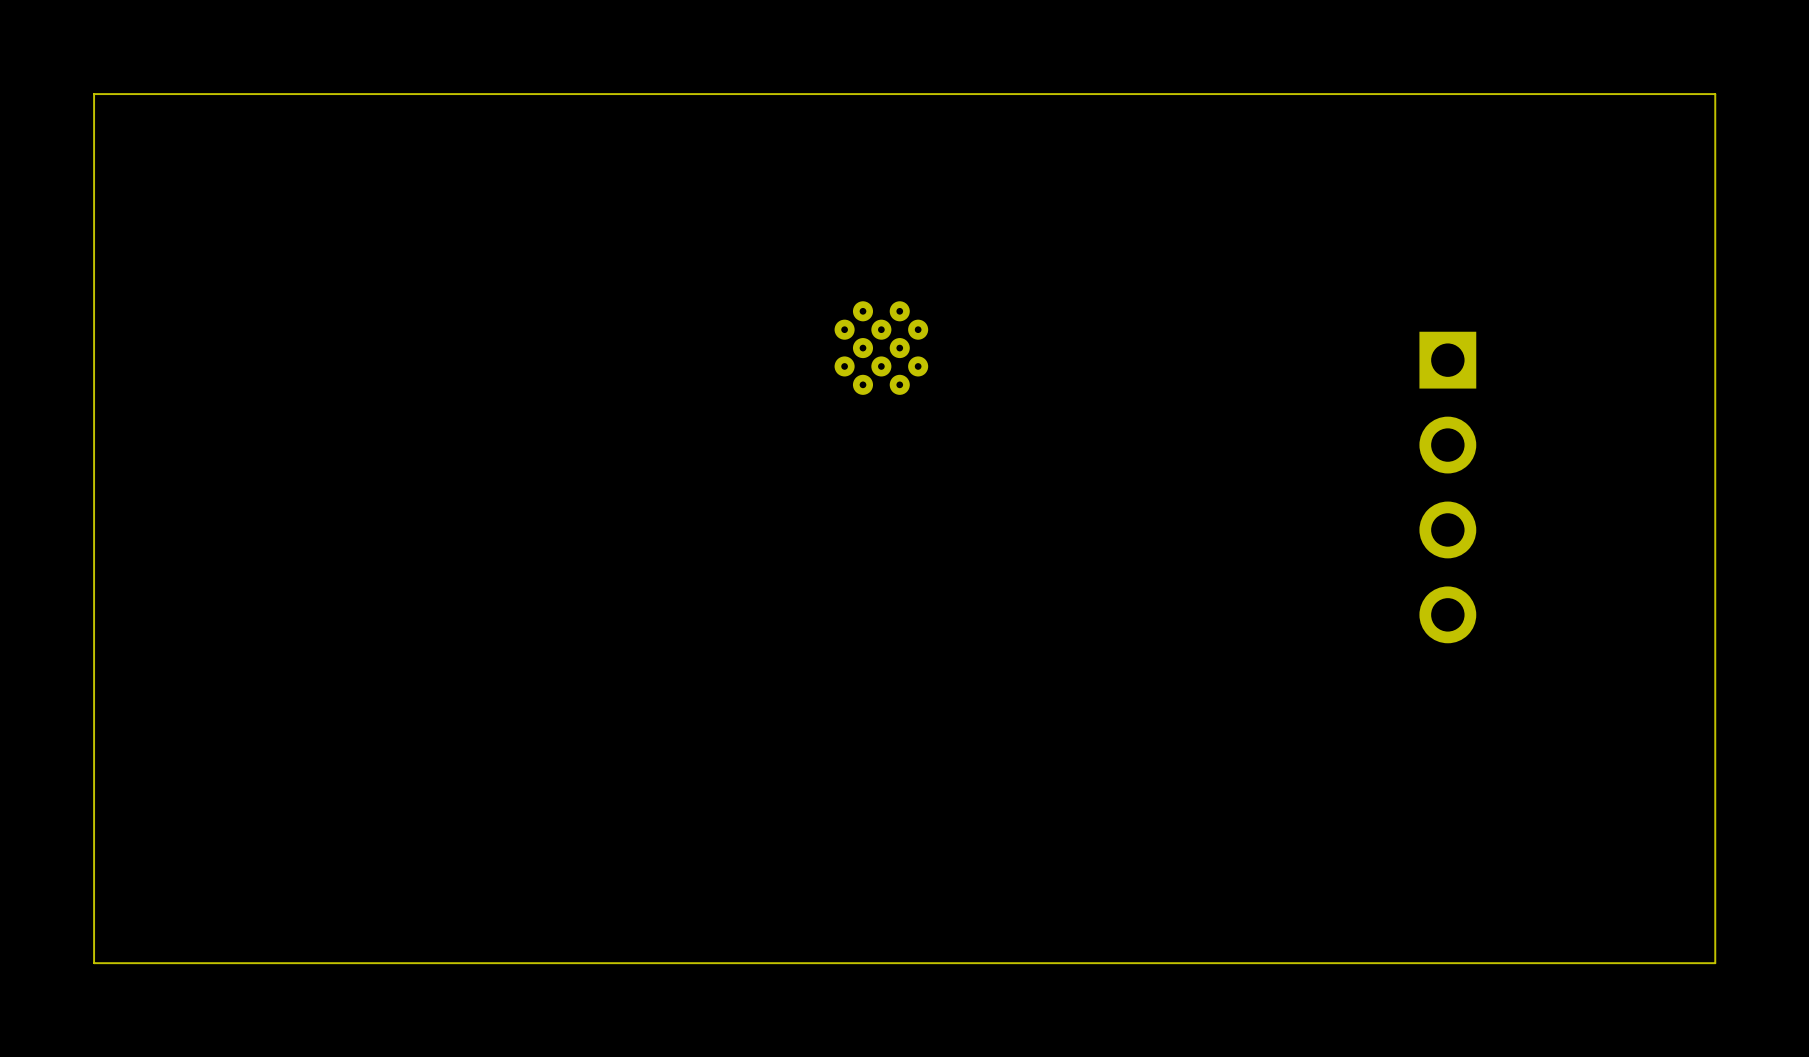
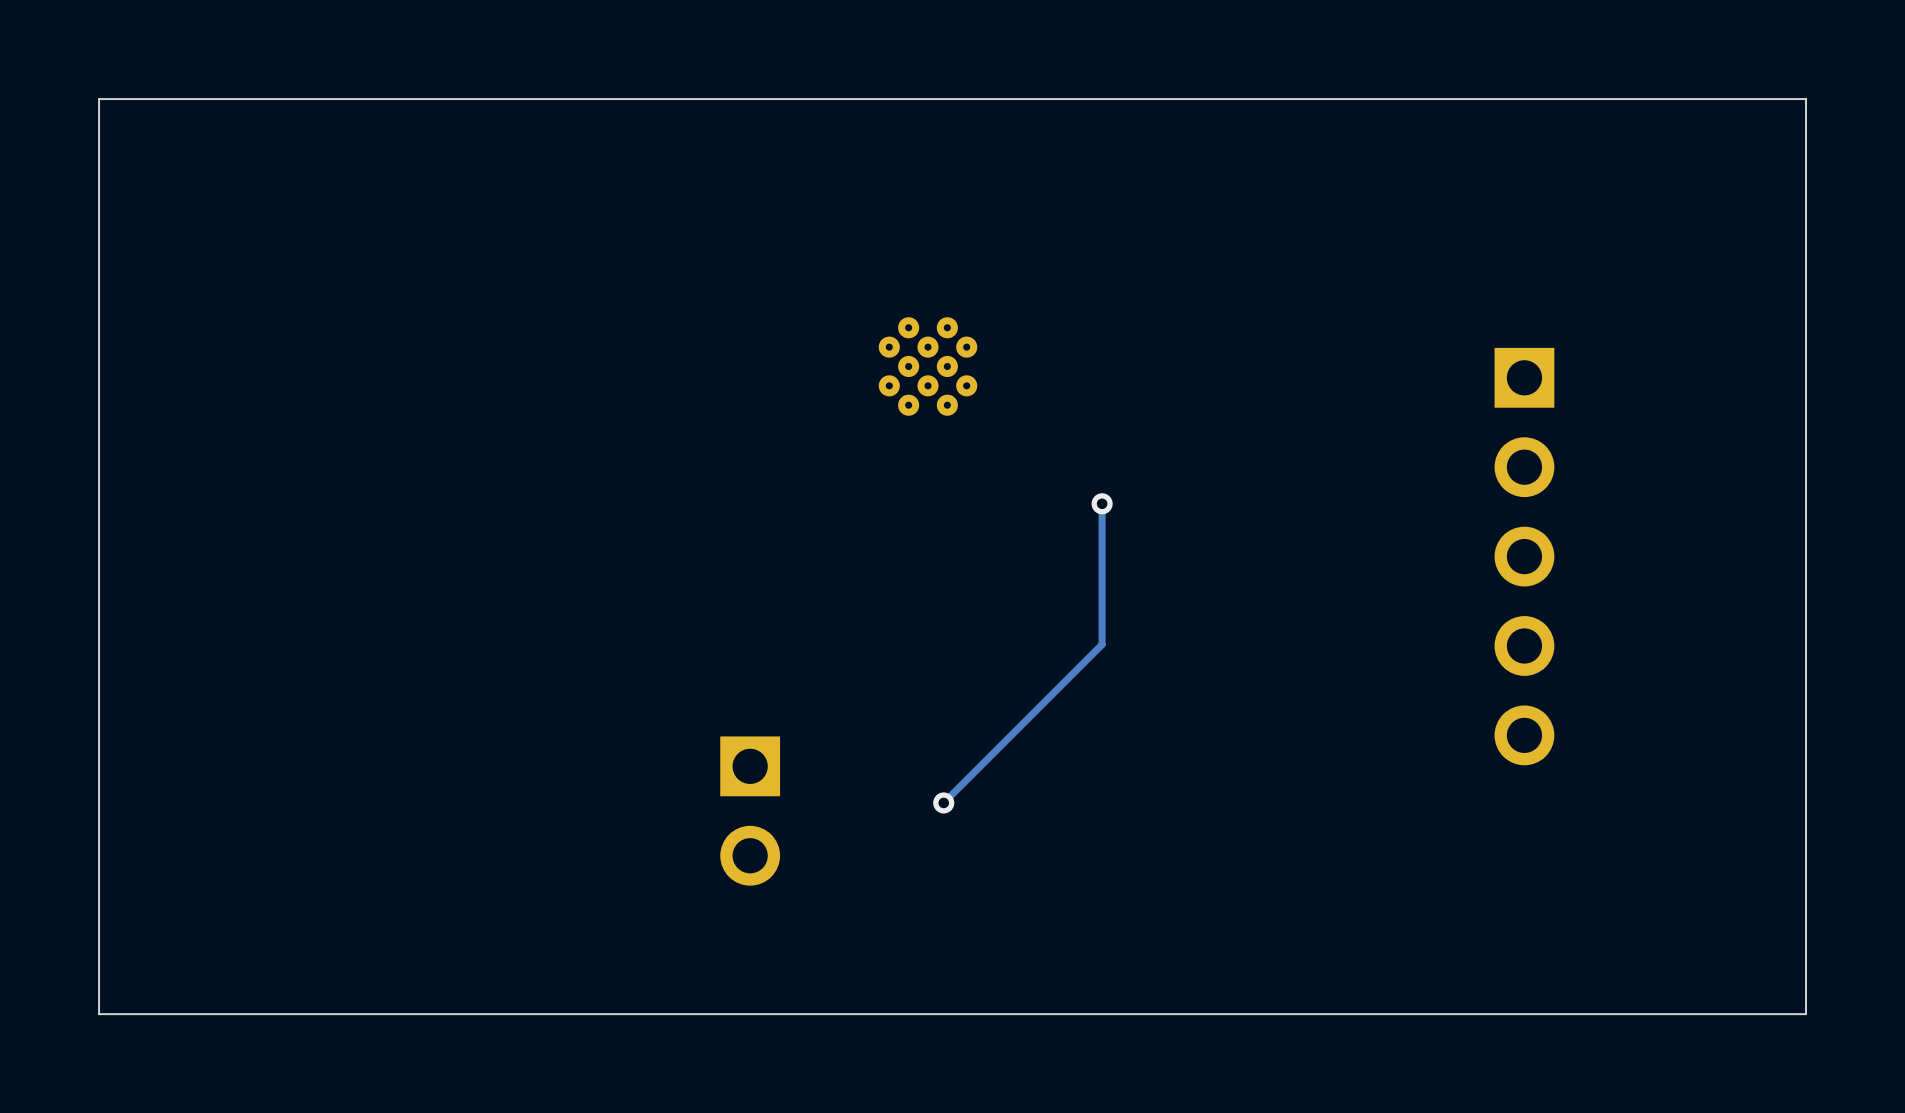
track: none -> (1102, 503) (1102, 644) (943, 802)
via: none -> (1102, 503)
part: (1447, 487) -> none
part: none -> (1524, 556)
via: none -> (943, 802)
part: none -> (750, 811)

